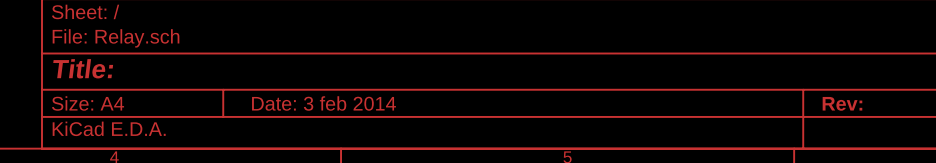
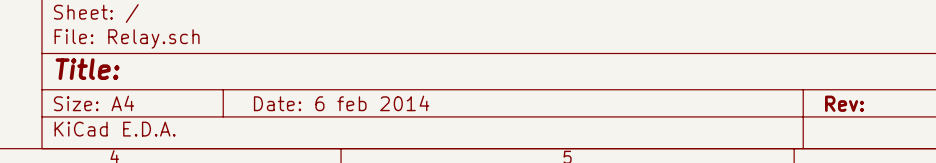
title block: Date: 3 feb 2014 (324, 103) -> Date: 6 feb 2014 (341, 103)

